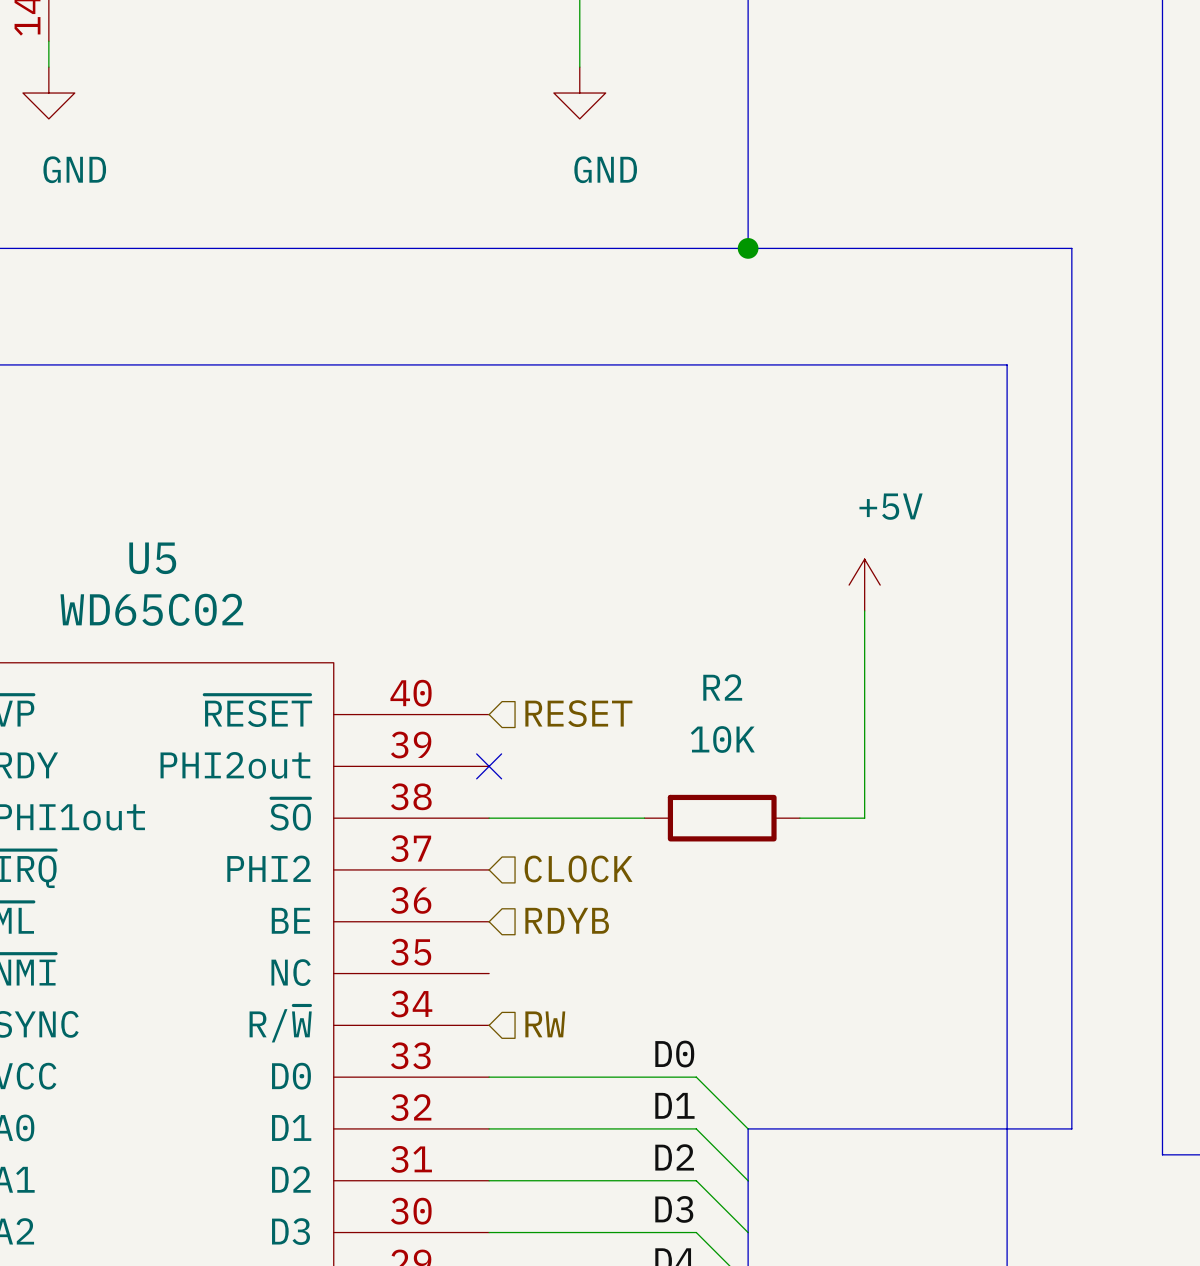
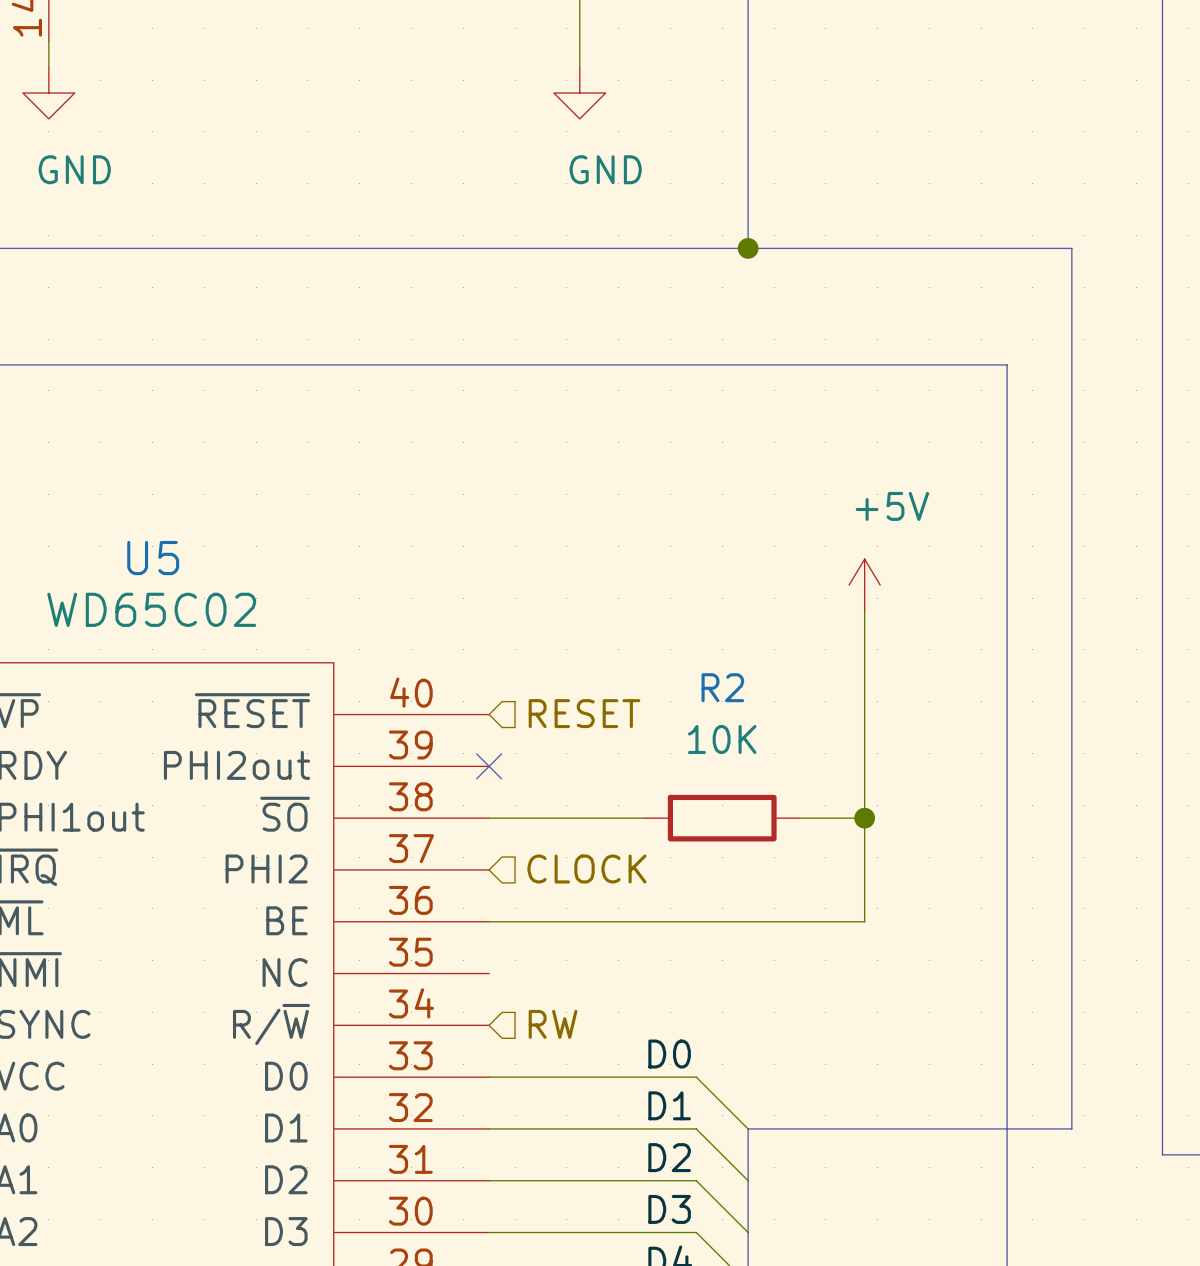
wire: none -> (864, 818) (864, 921) (489, 921)
junction: none -> (864, 818)
hierarchical label: RDYB (567, 920) -> none

